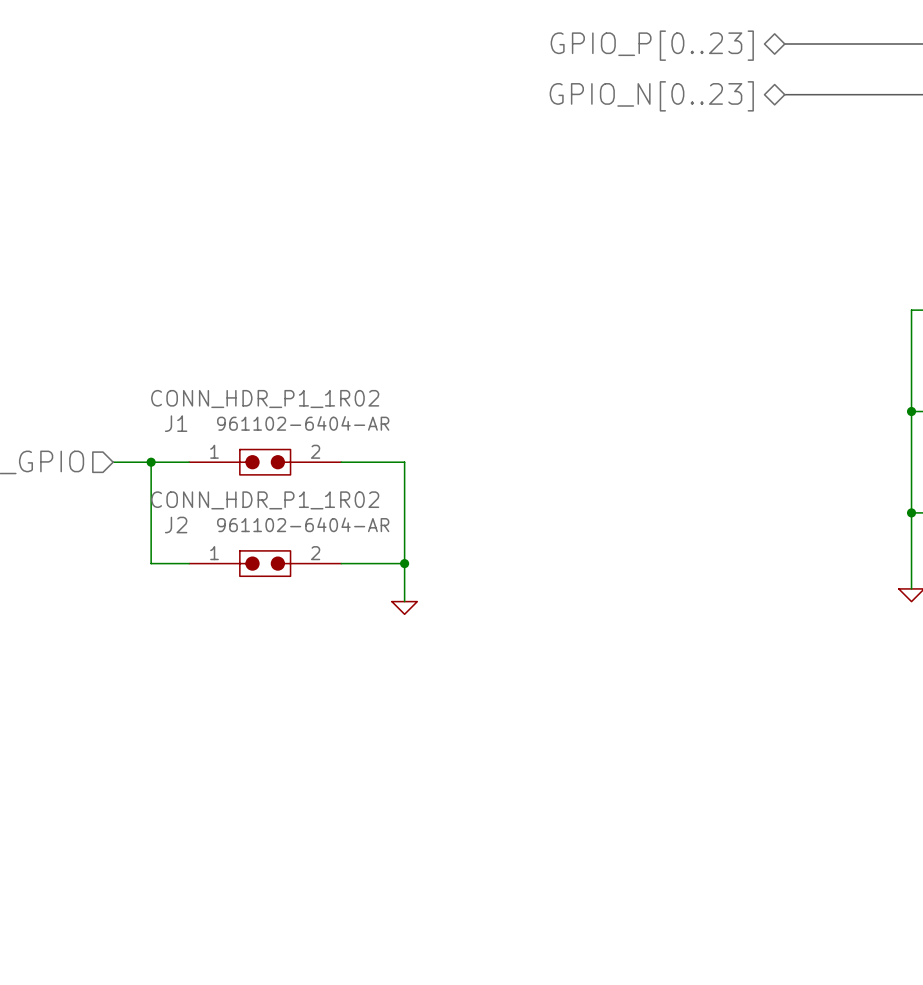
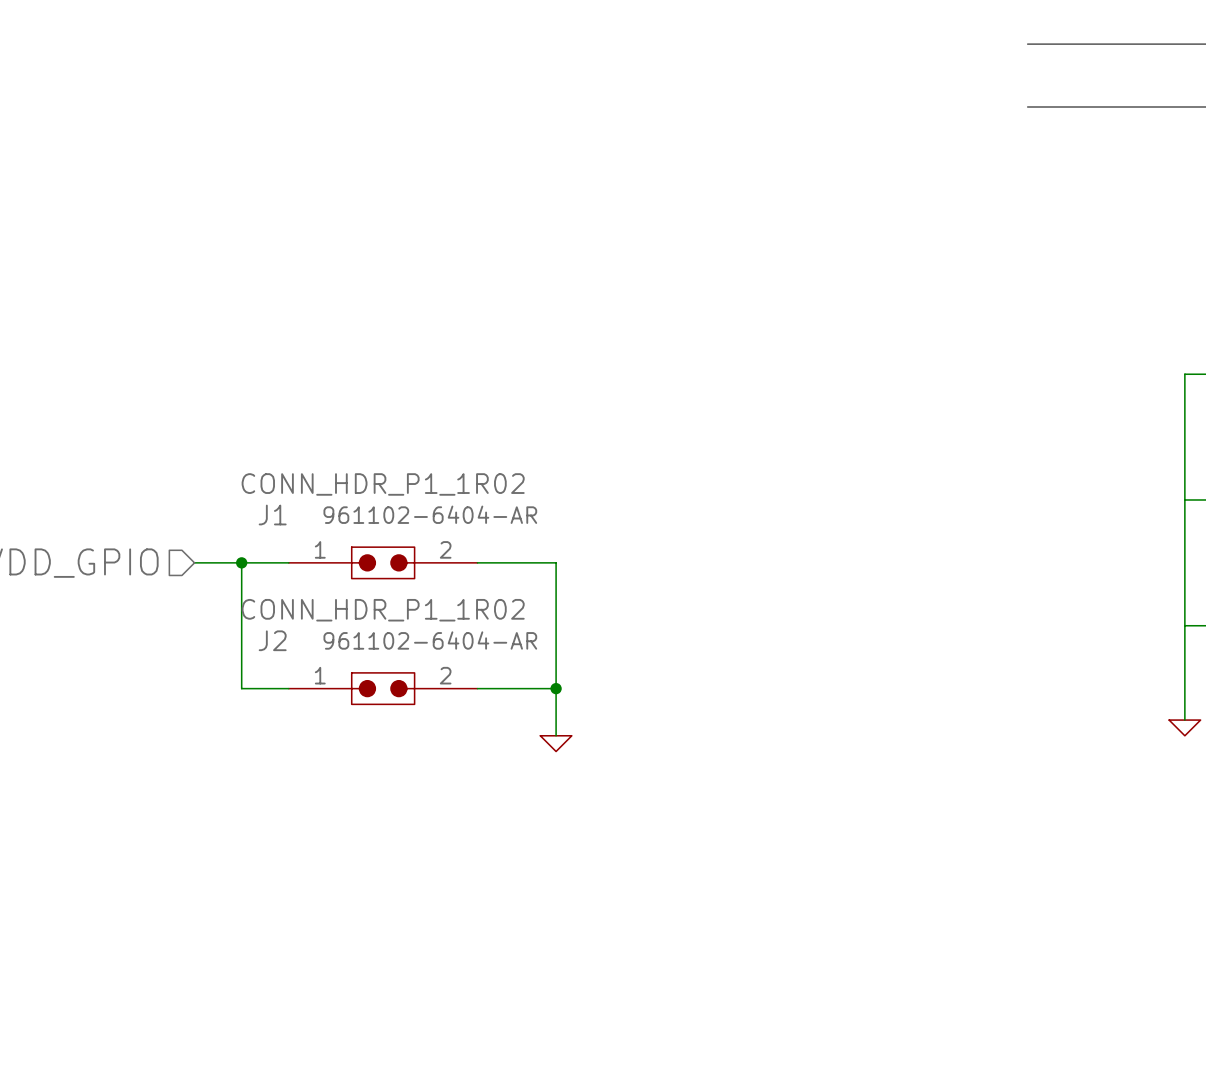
hierarchical label: GPIO_P[0..23] (652, 45) -> none
hierarchical label: GPIO_N[0..23] (651, 96) -> none
junction: (911, 411) -> none
junction: (911, 512) -> none

